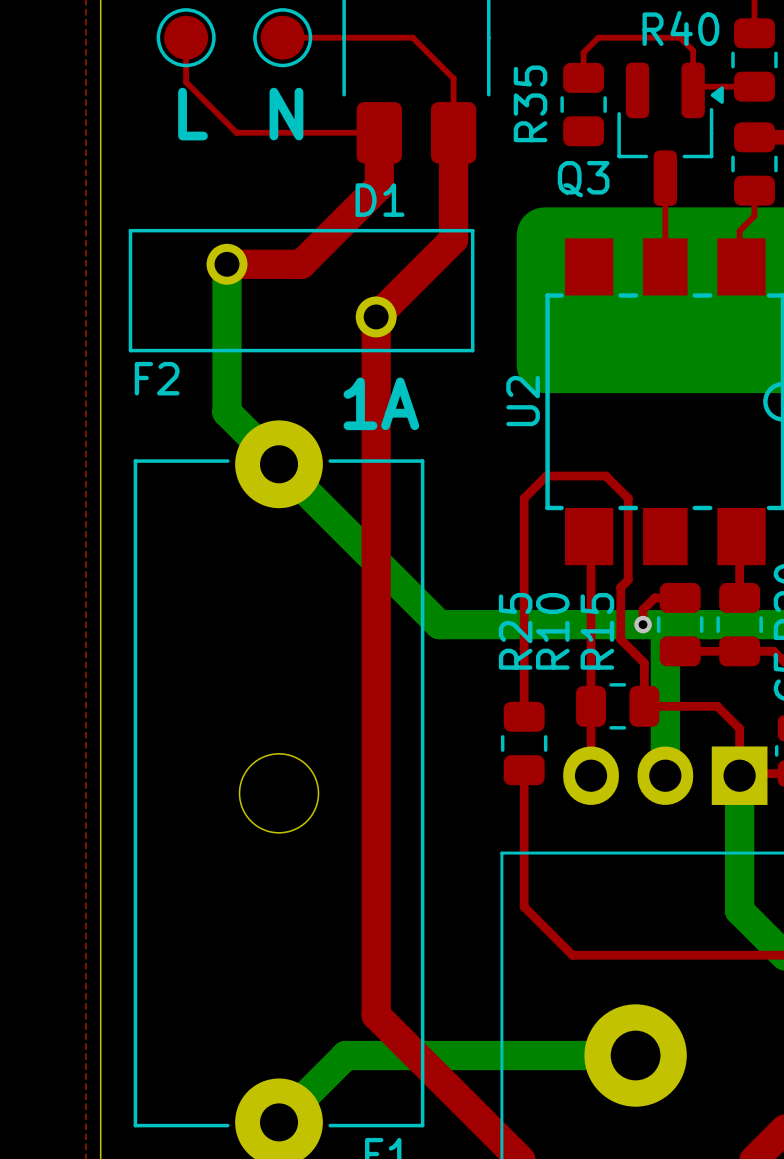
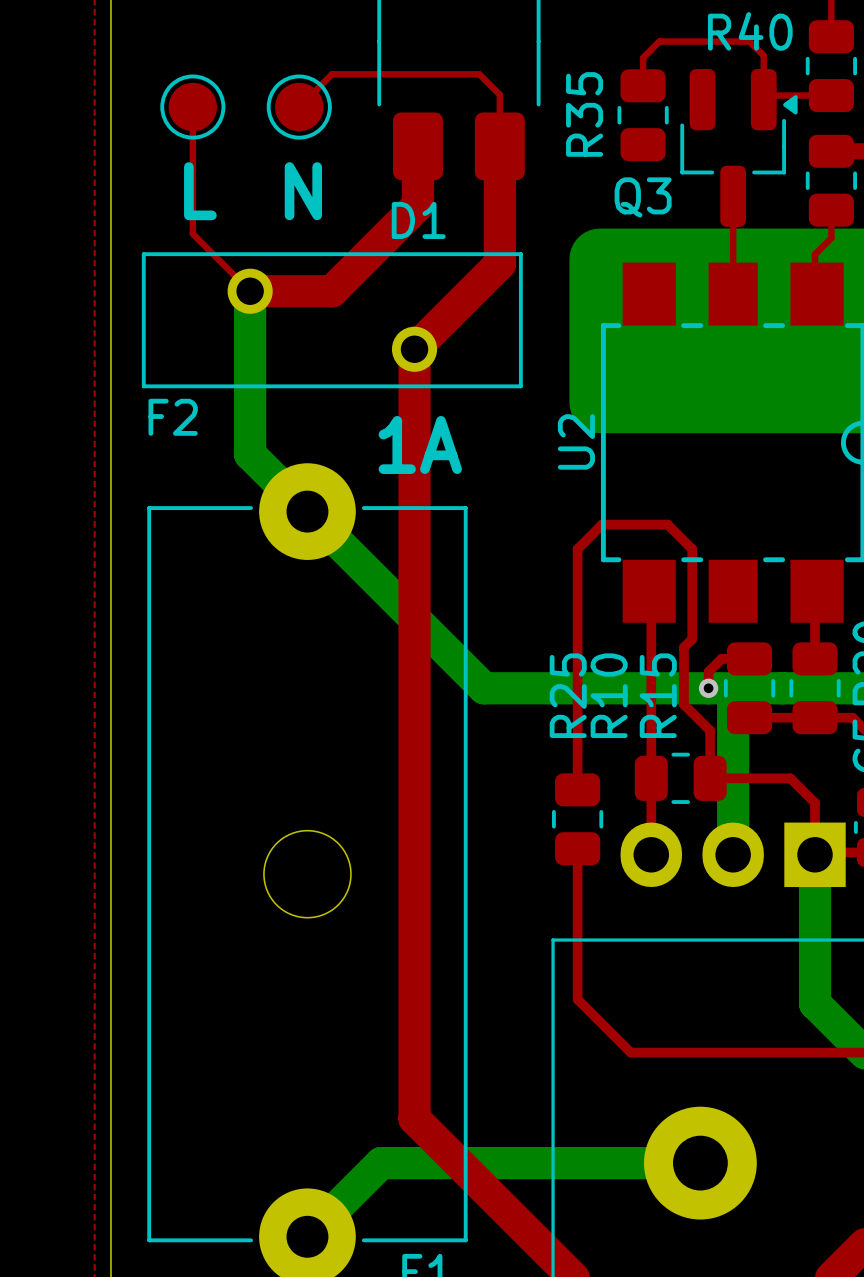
top track: (186, 37) (186, 82) (236, 132) (379, 132) -> none
part: (186, 37) -> none
top track: (282, 37) (412, 37) (453, 78) (453, 86) -> (299, 107) (332, 74) (479, 74) (499, 94)
part: (282, 37) -> none
top track: none -> (192, 107) (192, 233) (250, 291)
part: none -> (192, 107)
part: none -> (299, 107)
text position: L (192, 114) -> L (200, 191)
text position: N (286, 114) -> N (303, 191)

